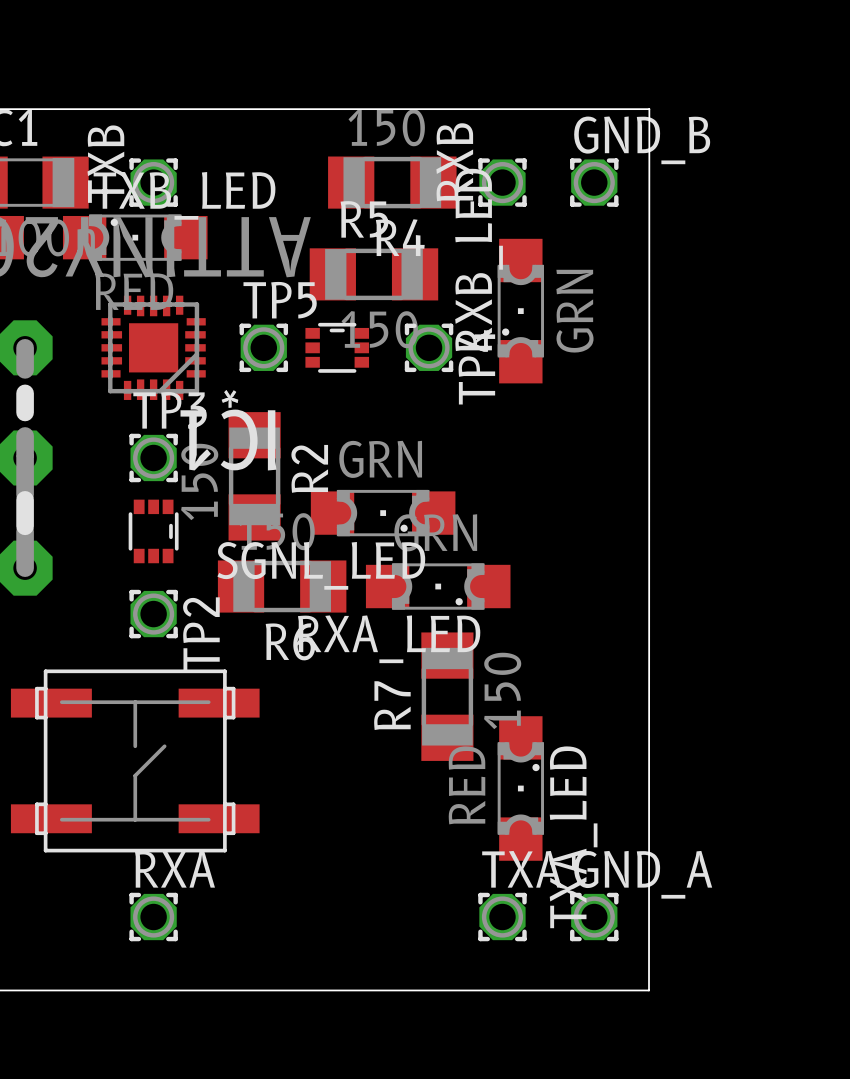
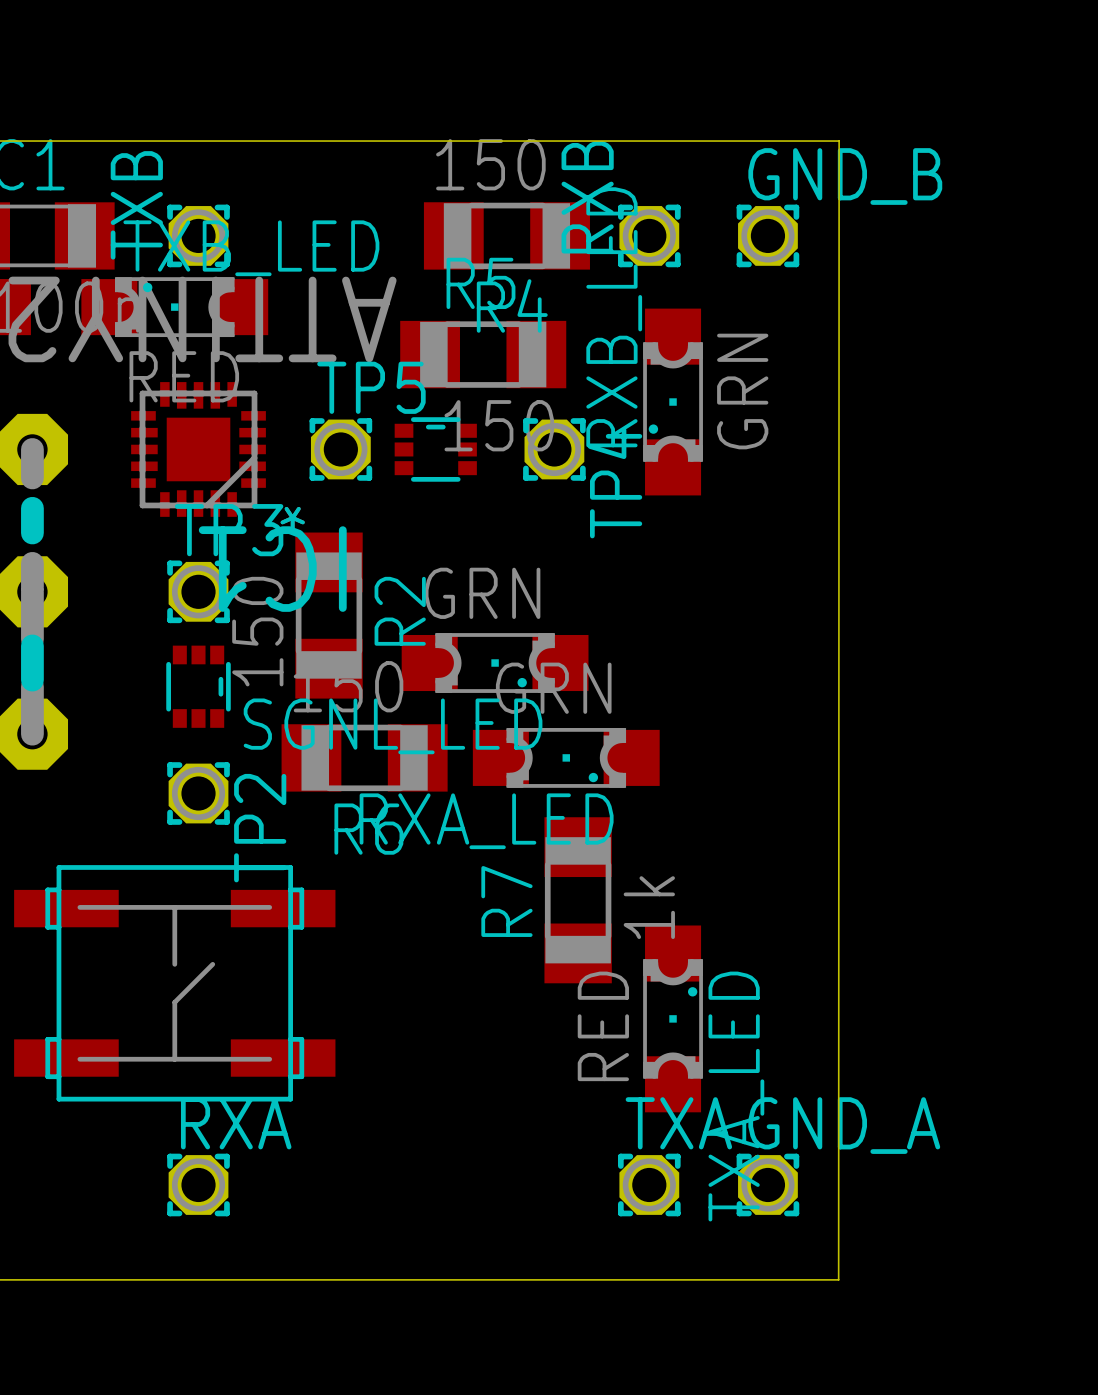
R7 value: 150 (502, 690) -> 1k (649, 907)

